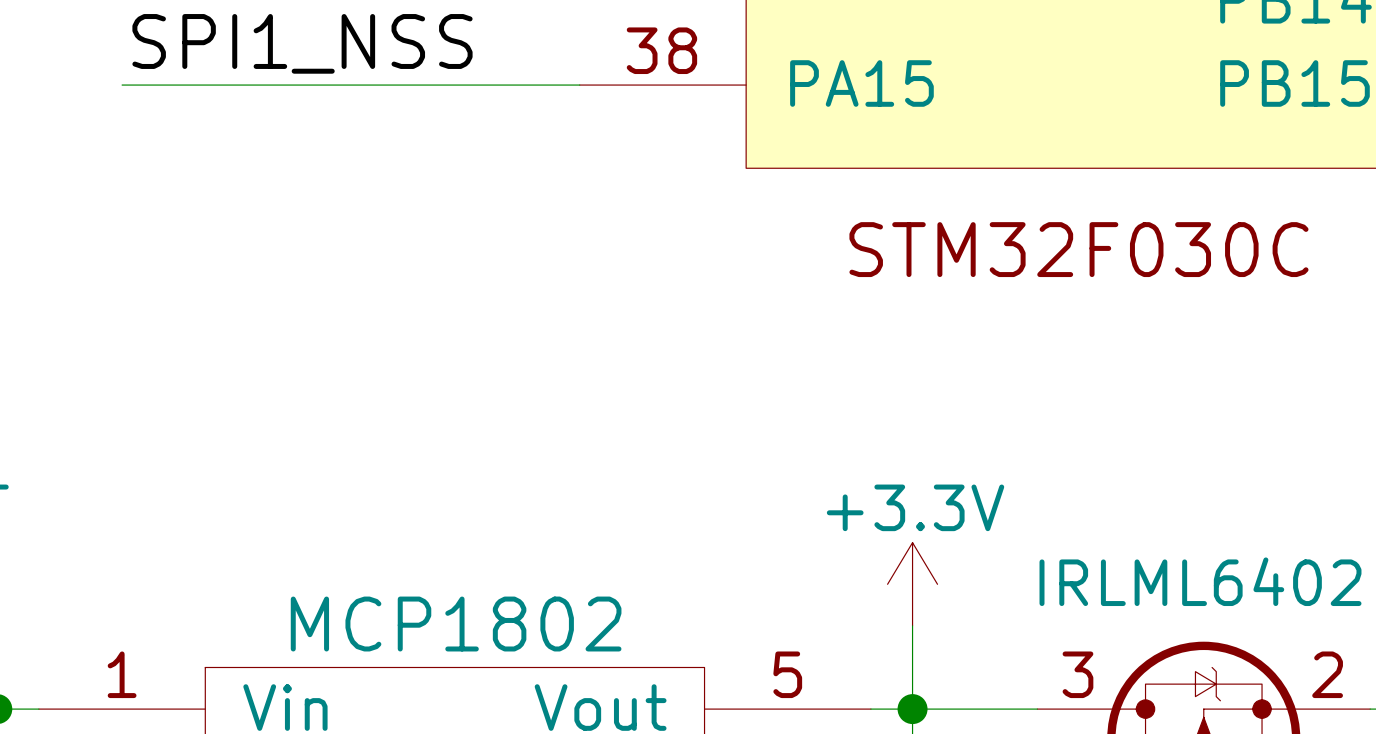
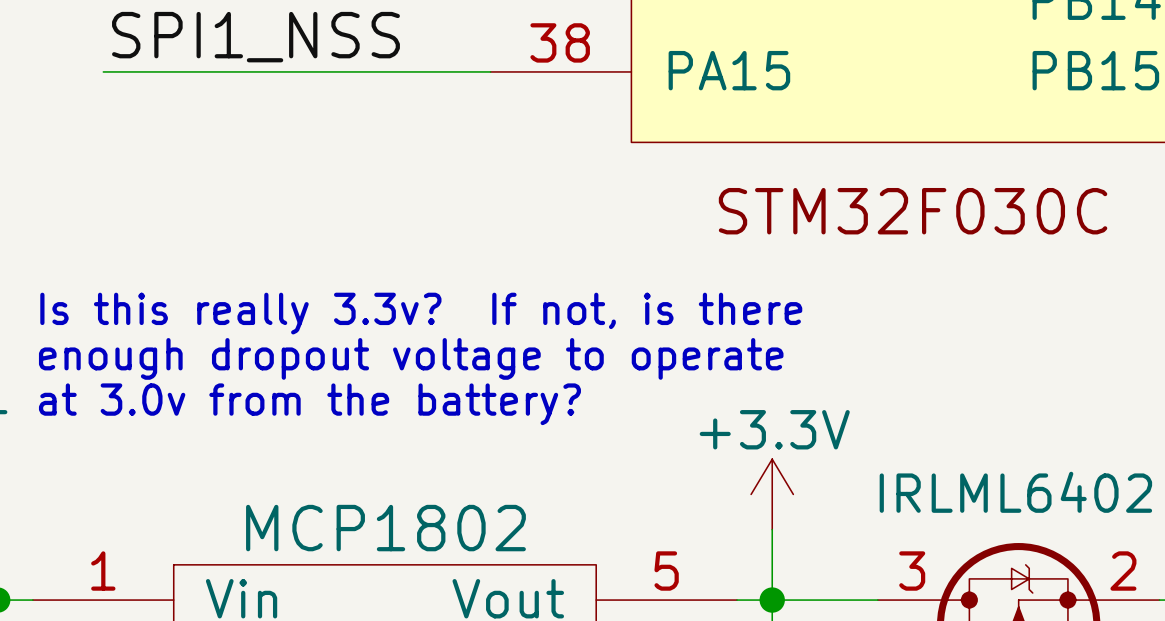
text: none -> Is this really 3.3v? If not, is there (421, 313)
text: none -> enough dropout voltage to operate (411, 358)
text: none -> at 3.0v from the battery? (309, 404)

